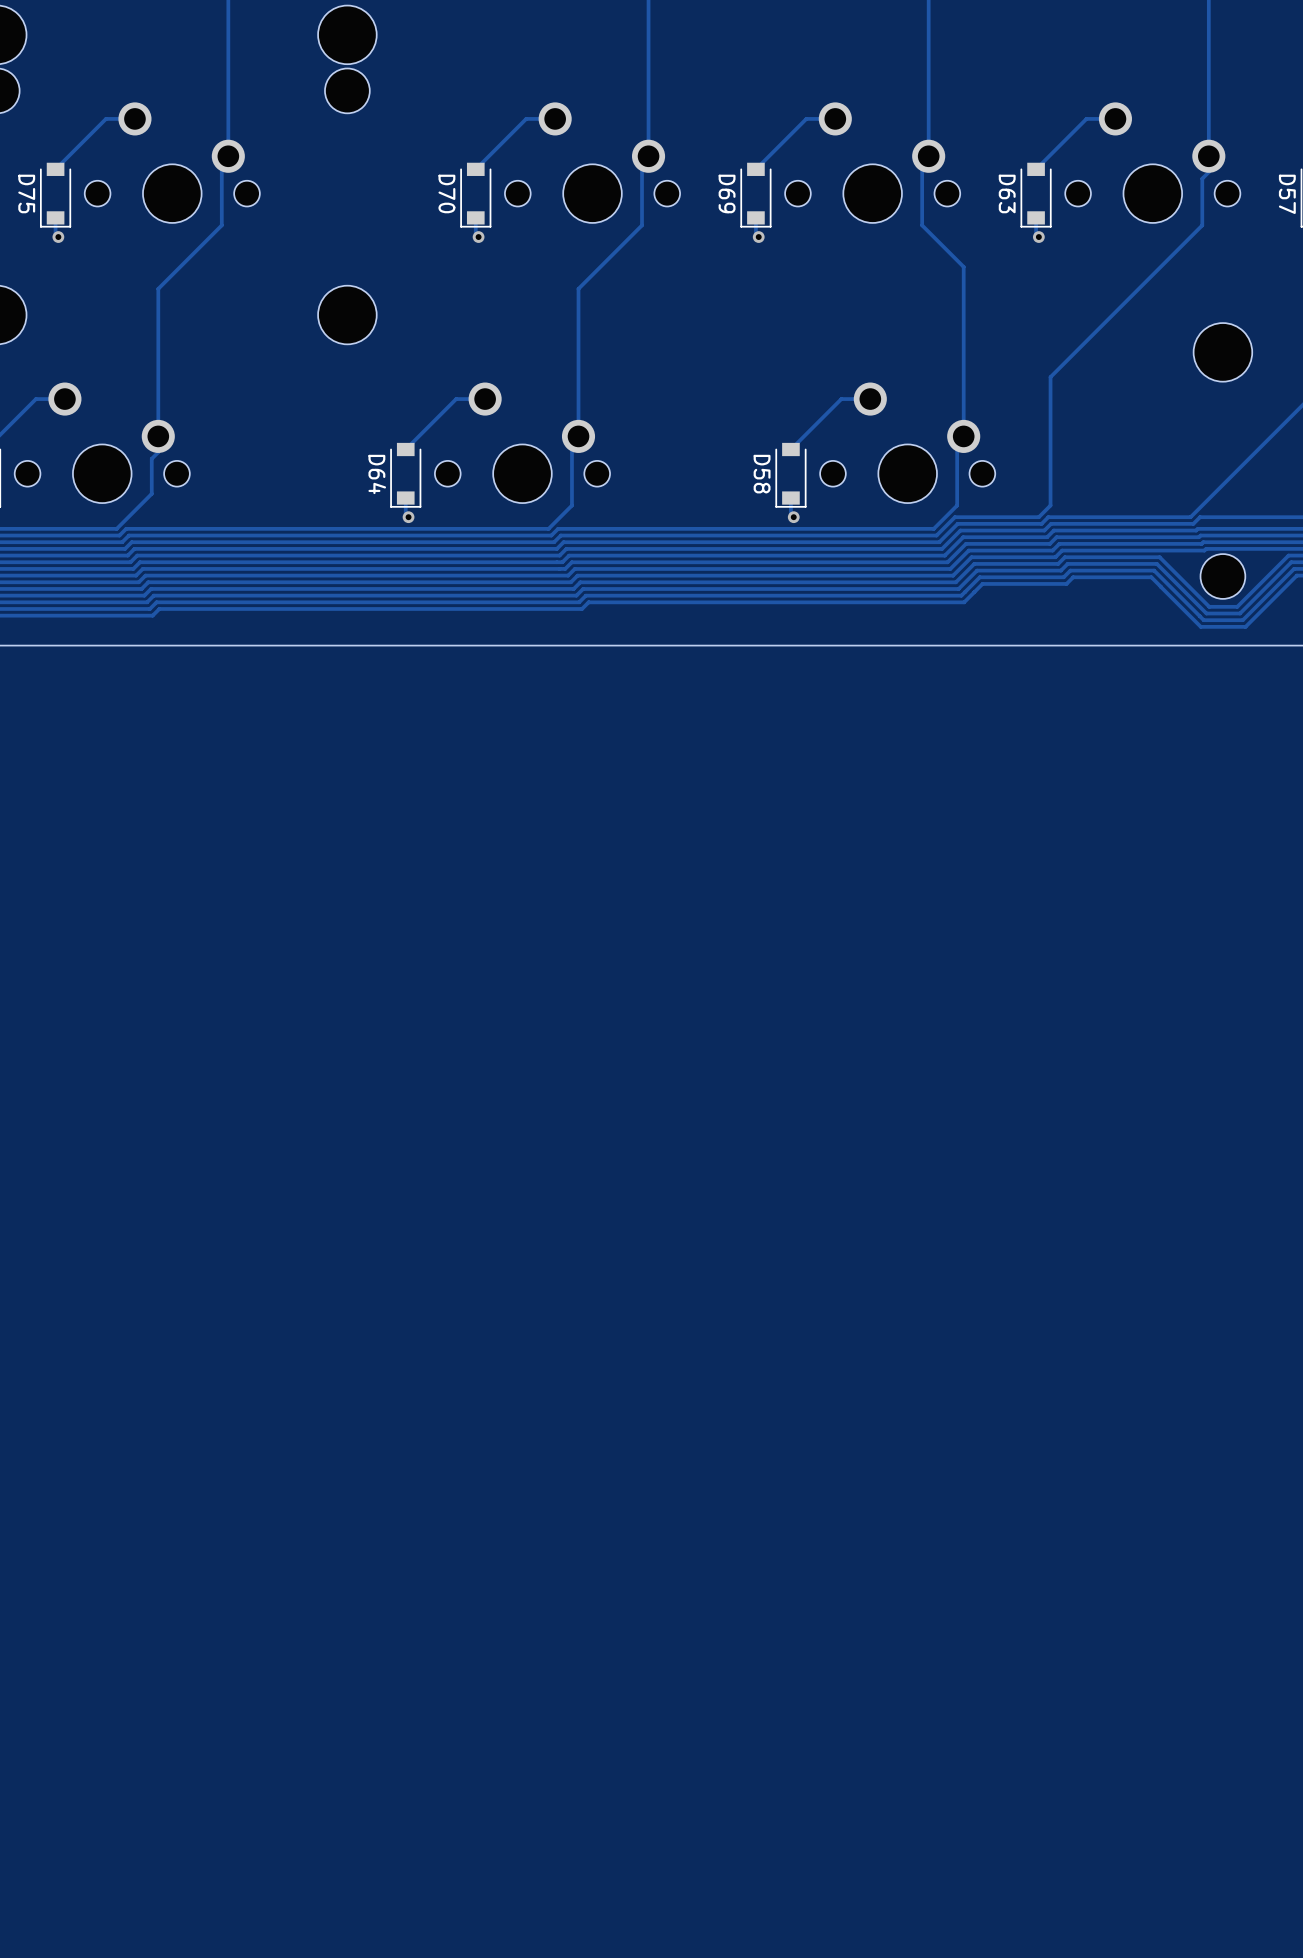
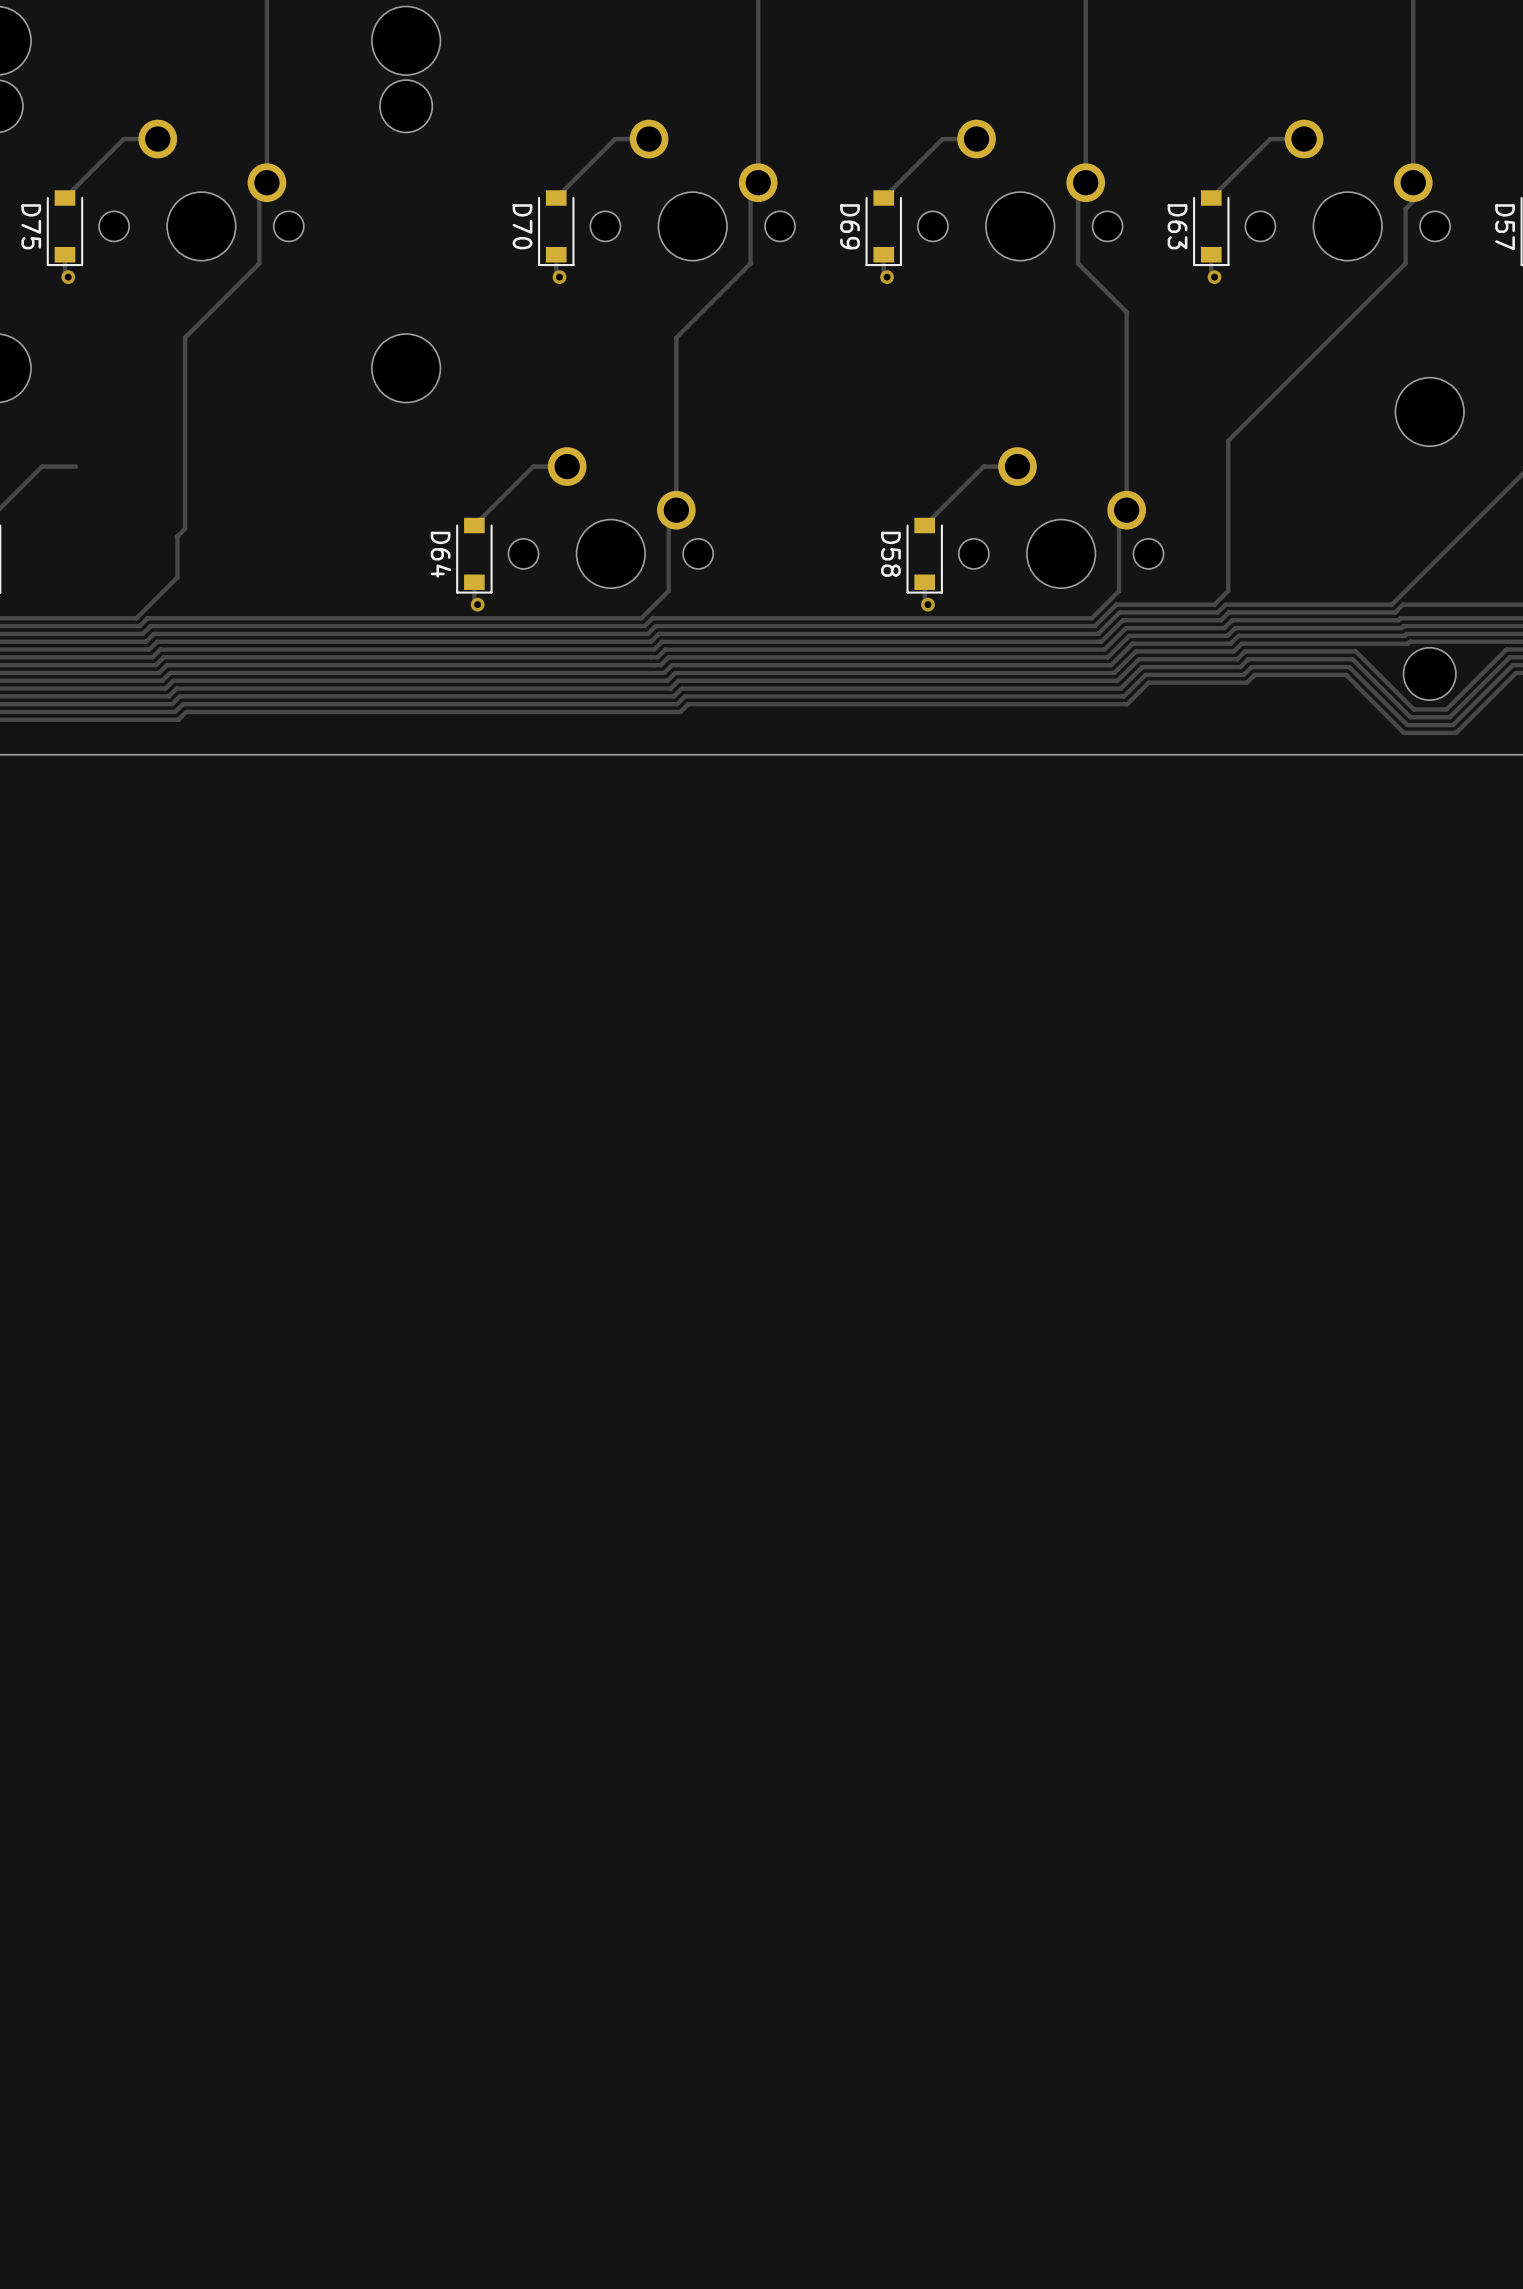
part: (102, 442) -> none

